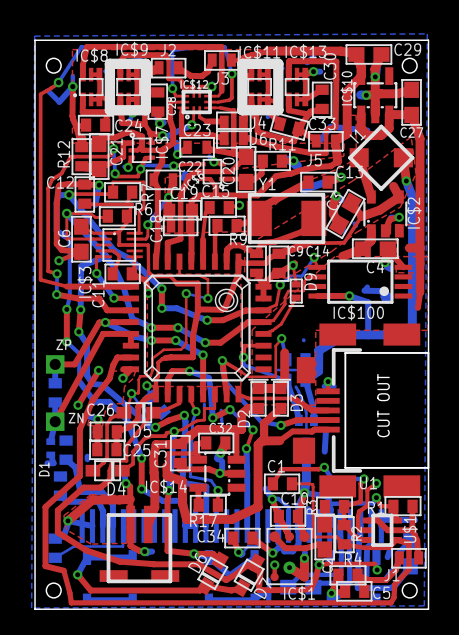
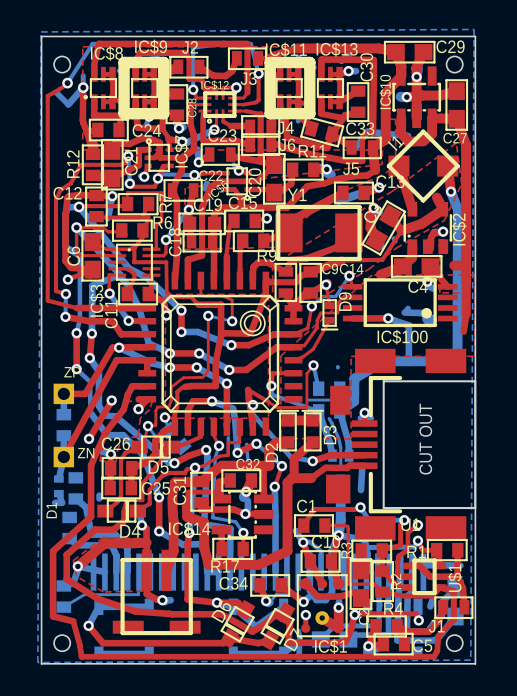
top track: (284, 352) (284, 379) (280, 388) -> none
via position: (222, 360) -> (253, 405)
top track: (238, 394) (248, 398) (294, 398) (312, 410) (328, 410) -> none

